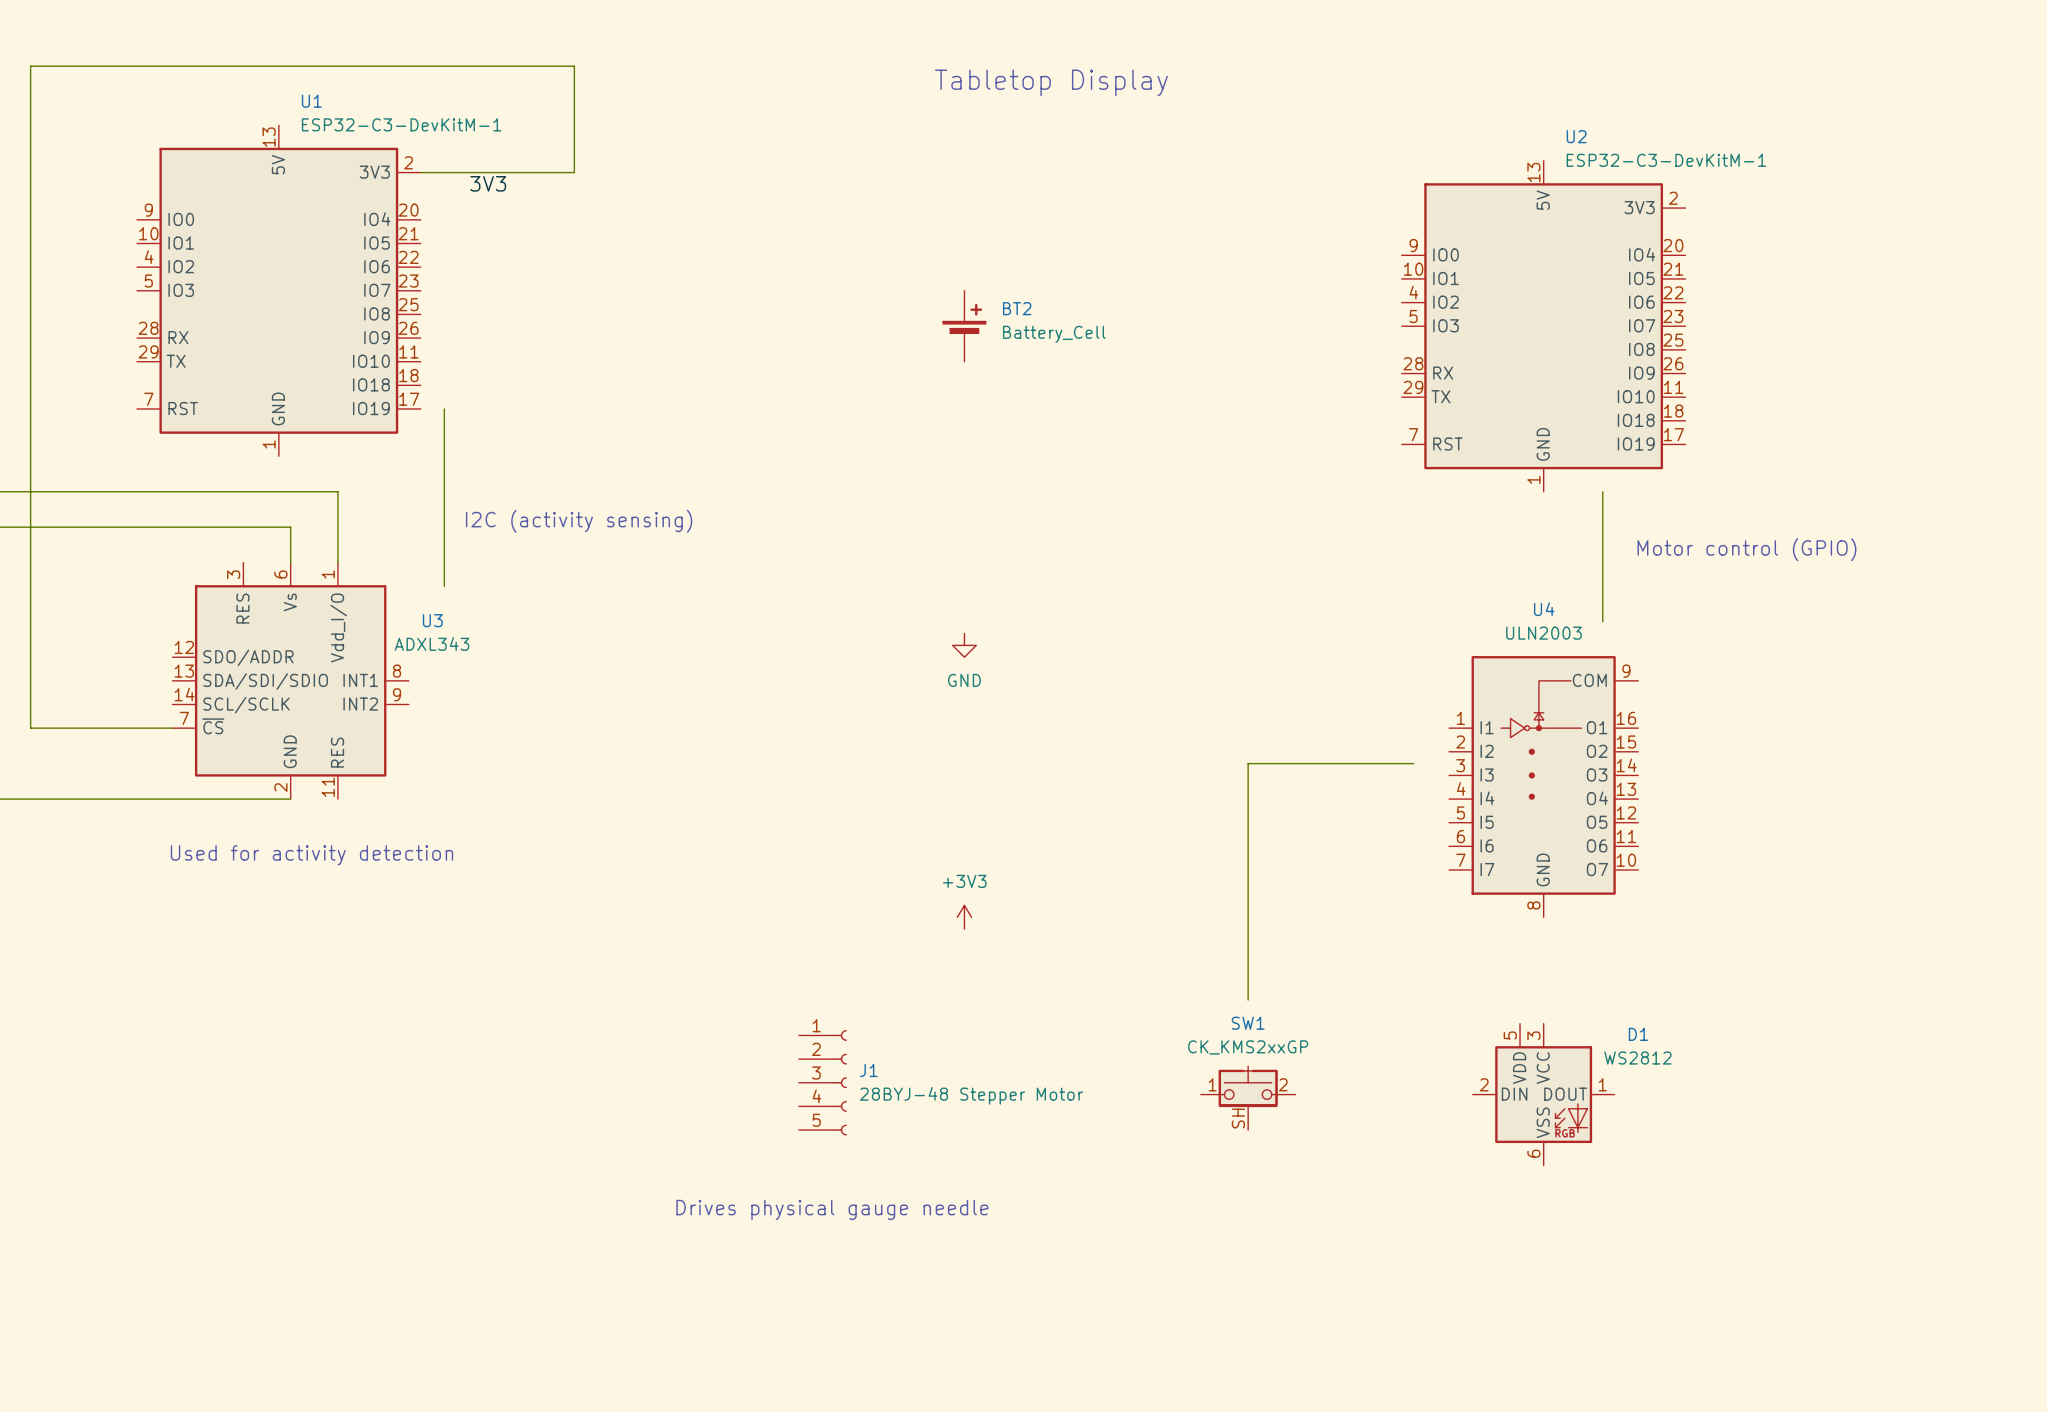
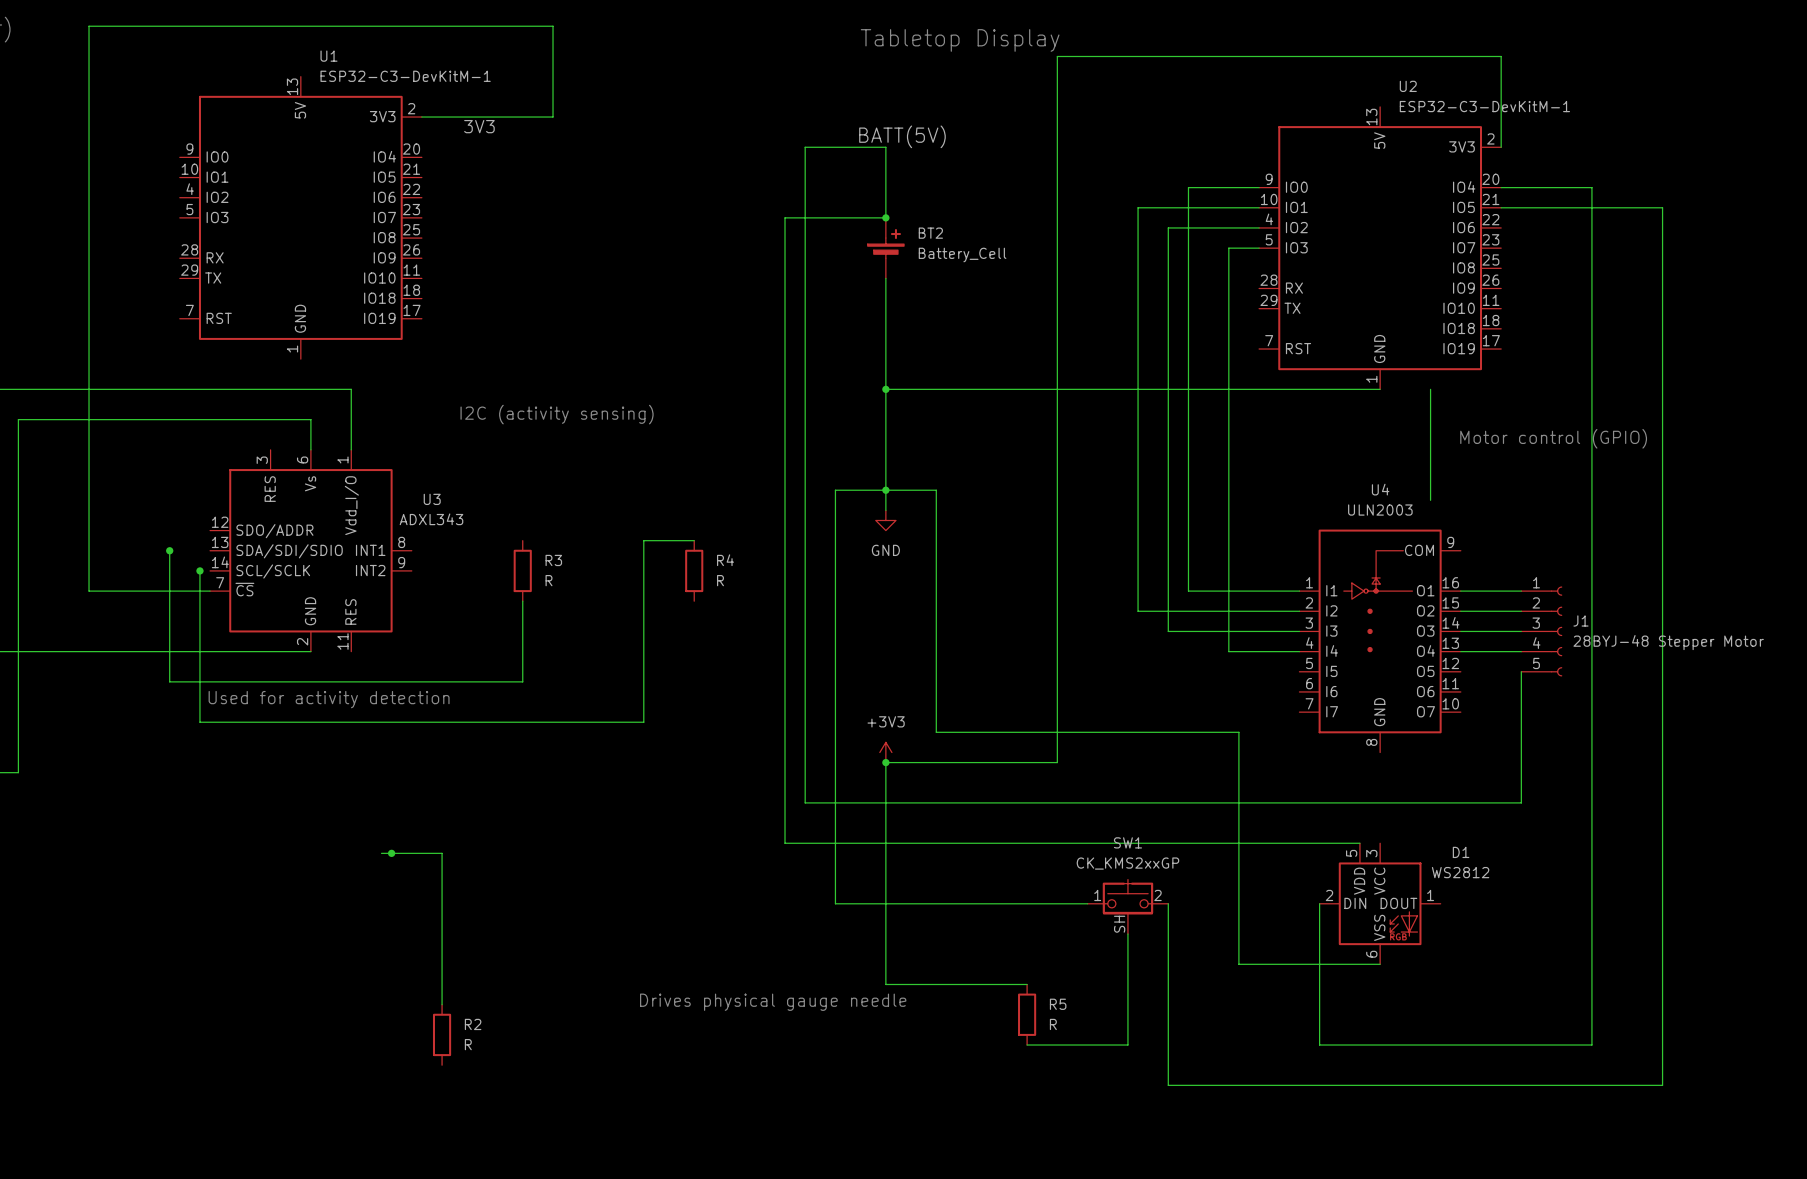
label: none -> BATT(5V) (902, 136)
wire: none -> (1501, 147) (1501, 56) (1057, 56) (1057, 762) (885, 762) (885, 984) (1027, 984)
wire: none -> (1259, 187) (1188, 187) (1188, 591) (1299, 591)
wire: none -> (1501, 187) (1591, 187) (1591, 1045) (1319, 1045) (1319, 903)
wire: none -> (1259, 207) (1138, 207) (1138, 611) (1299, 611)
wire: none -> (1501, 207) (1662, 207) (1662, 1085) (1168, 1085) (1168, 903)
junction: none -> (885, 217)
wire: none -> (1259, 227) (1168, 227) (1168, 631) (1299, 631)
wire: none -> (1259, 248) (1228, 248) (1228, 651) (1299, 651)
wire: none -> (885, 278) (885, 510)
wire: (444, 408) (444, 586) -> none
wire: none -> (885, 389) (1380, 389)
junction: none -> (885, 389)
junction: none -> (885, 490)
wire: none -> (694, 540) (643, 540) (643, 722) (199, 722) (199, 570)
wire: none -> (169, 550) (169, 681) (522, 681) (522, 601)
junction: none -> (169, 550)
junction: none -> (199, 570)
R3: none -> R (522, 570)
R4: none -> R (694, 570)
wire: none -> (1460, 591) (1521, 591)
wire: none -> (1460, 611) (1521, 611)
wire: (1413, 763) (1248, 763) (1248, 1000) -> none
wire: none -> (1460, 631) (1521, 631)
wire: none -> (1460, 651) (1521, 651)
wire: none -> (1521, 671) (1521, 802) (805, 802) (805, 147) (885, 147) (885, 217) (785, 217) (785, 843) (1359, 843)
junction: none -> (885, 762)
wire: none -> (381, 853) (442, 853) (442, 1004)
junction: none -> (391, 853)
J1 position: (822, 1082) -> (1541, 631)
wire: none -> (1087, 903) (835, 903) (835, 490) (936, 490) (936, 732) (1238, 732) (1238, 964) (1380, 964)
wire: none -> (1127, 934) (1127, 1045) (1027, 1045)
R5: none -> R (1027, 1014)
R2: none -> R (442, 1034)

